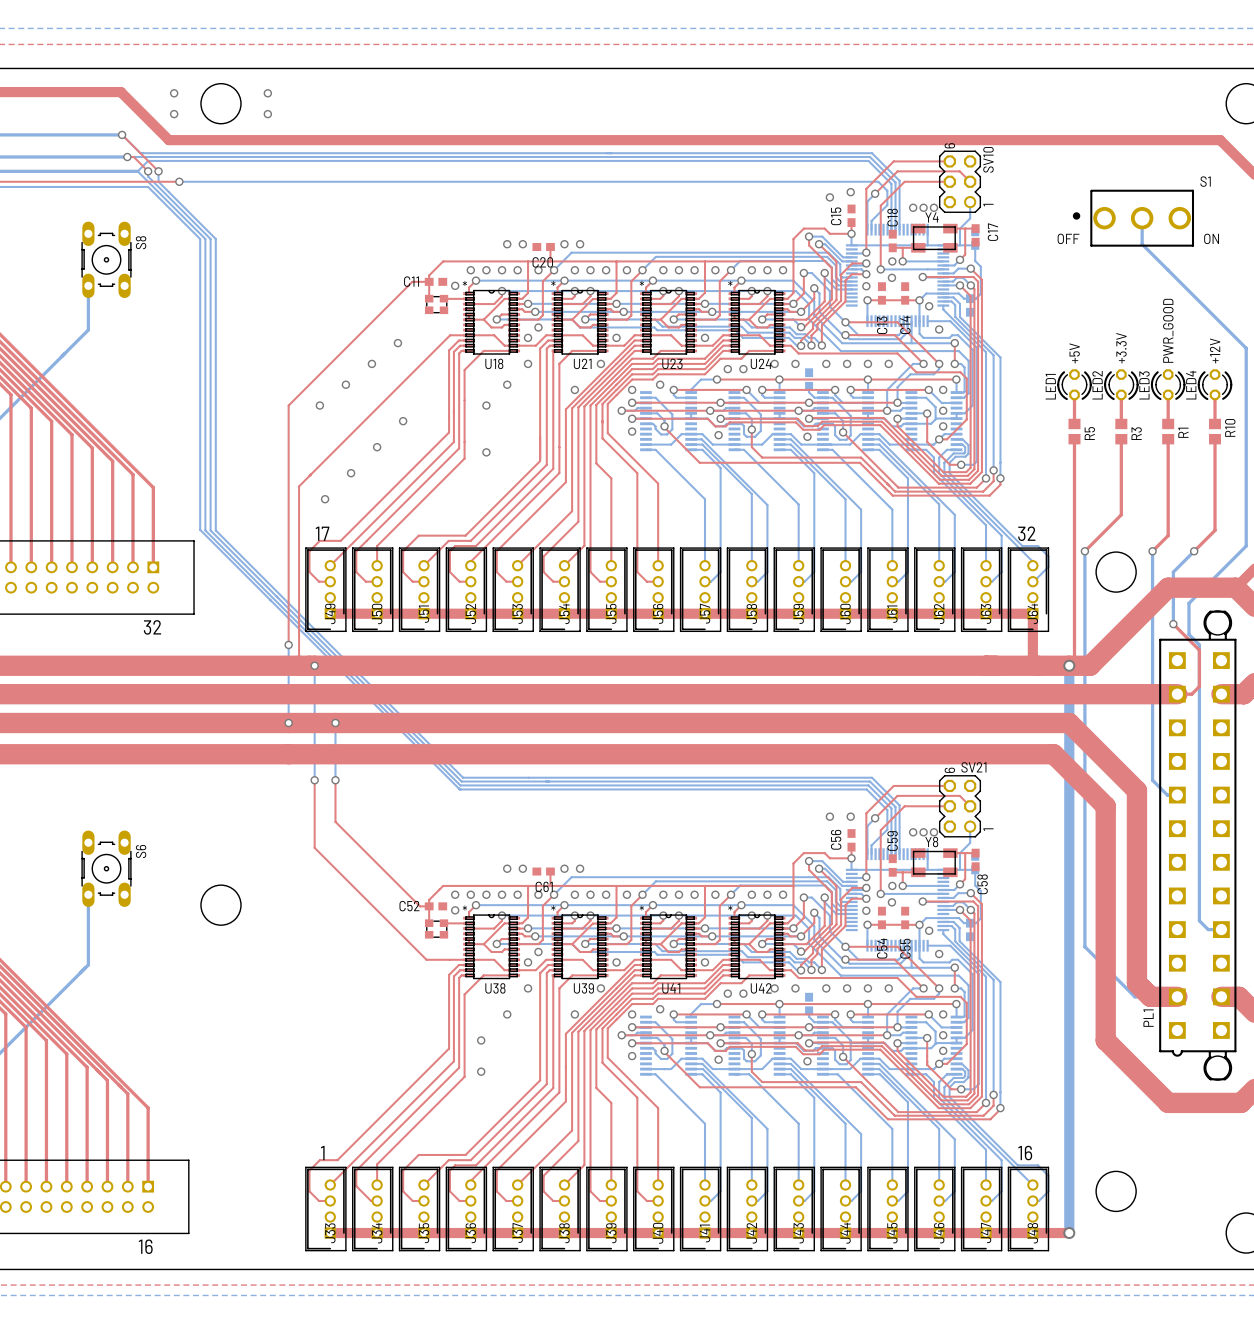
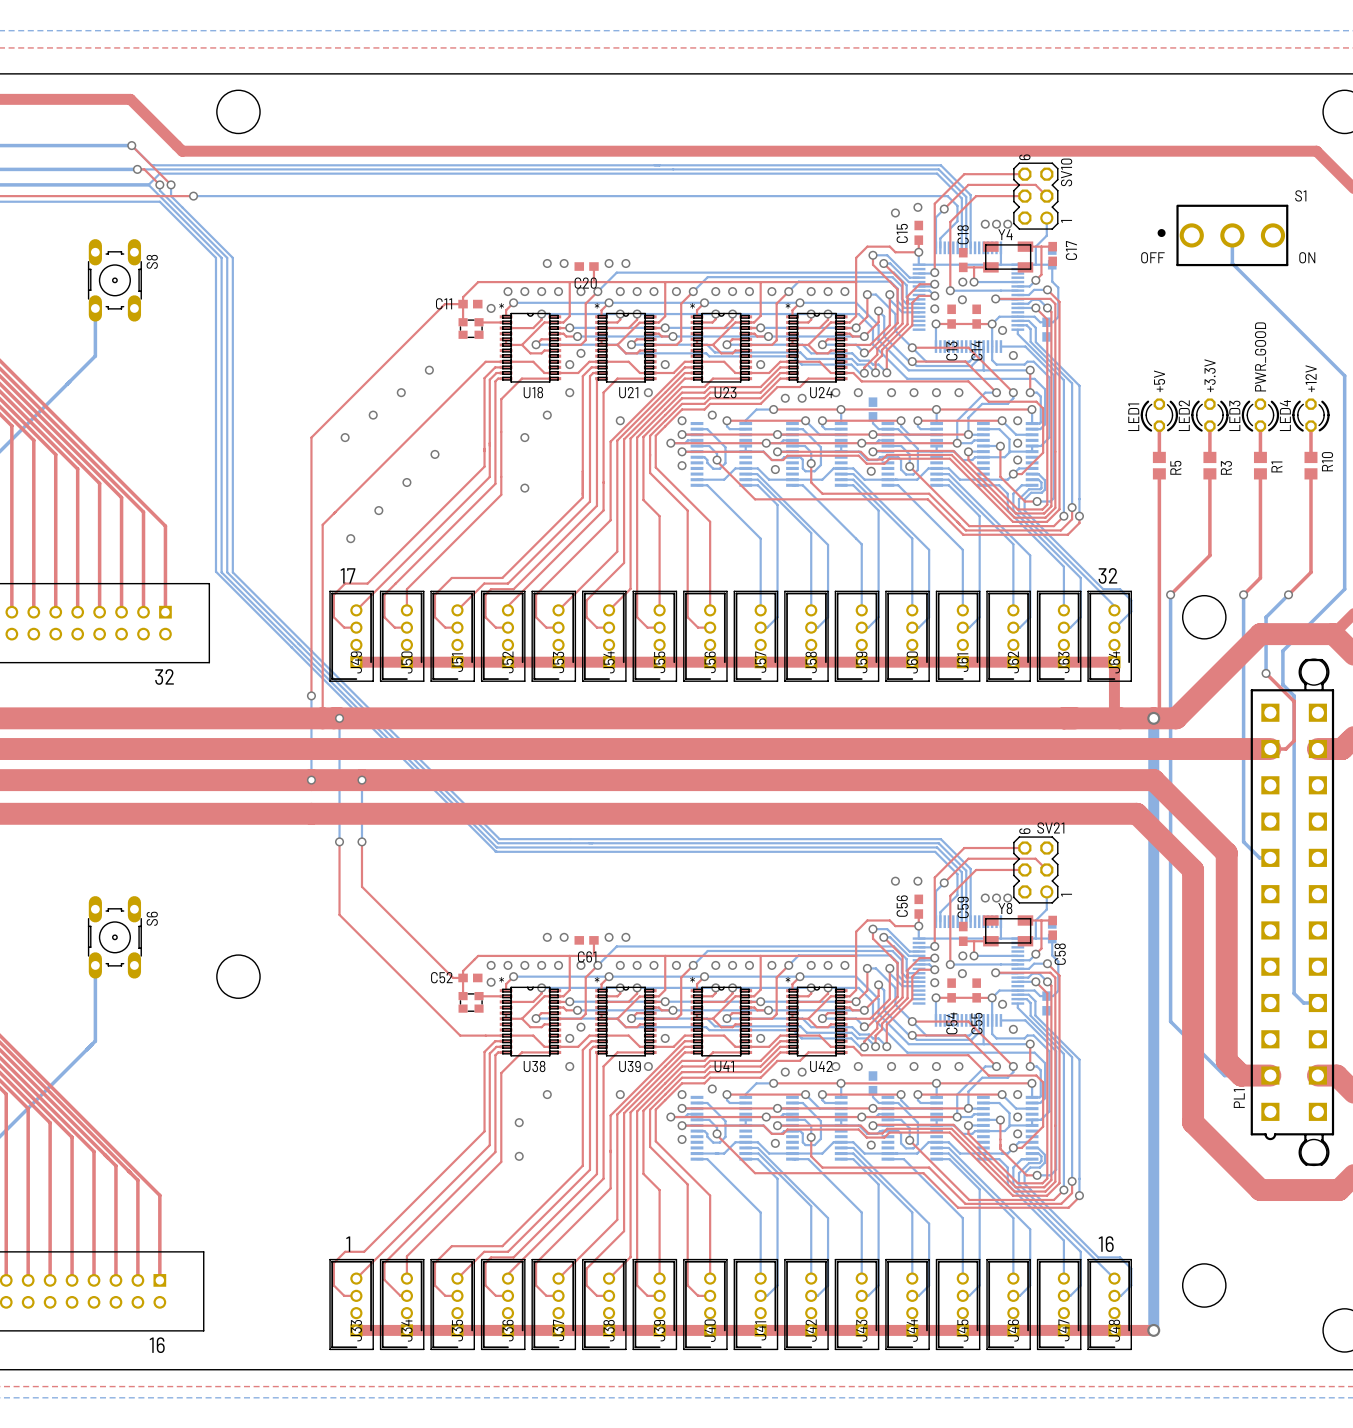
via: (174, 93) -> none
via: (267, 93) -> none
via: (174, 114) -> none
via: (267, 114) -> none

